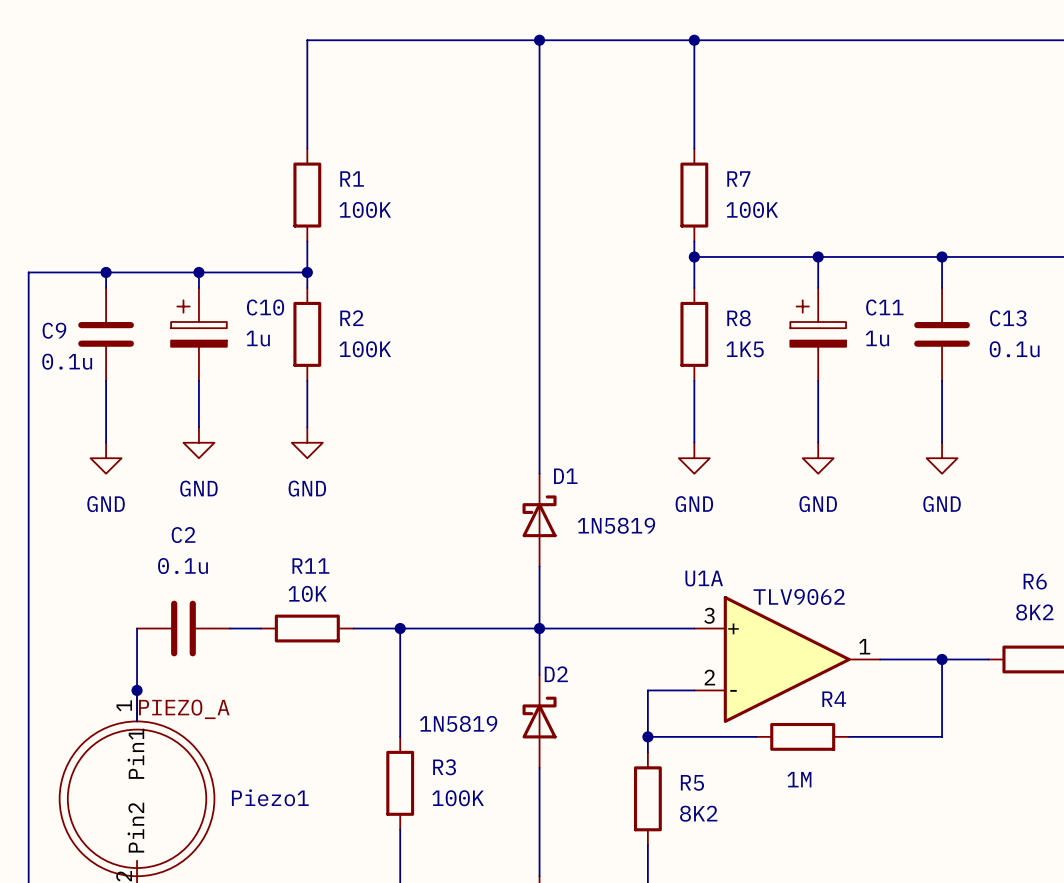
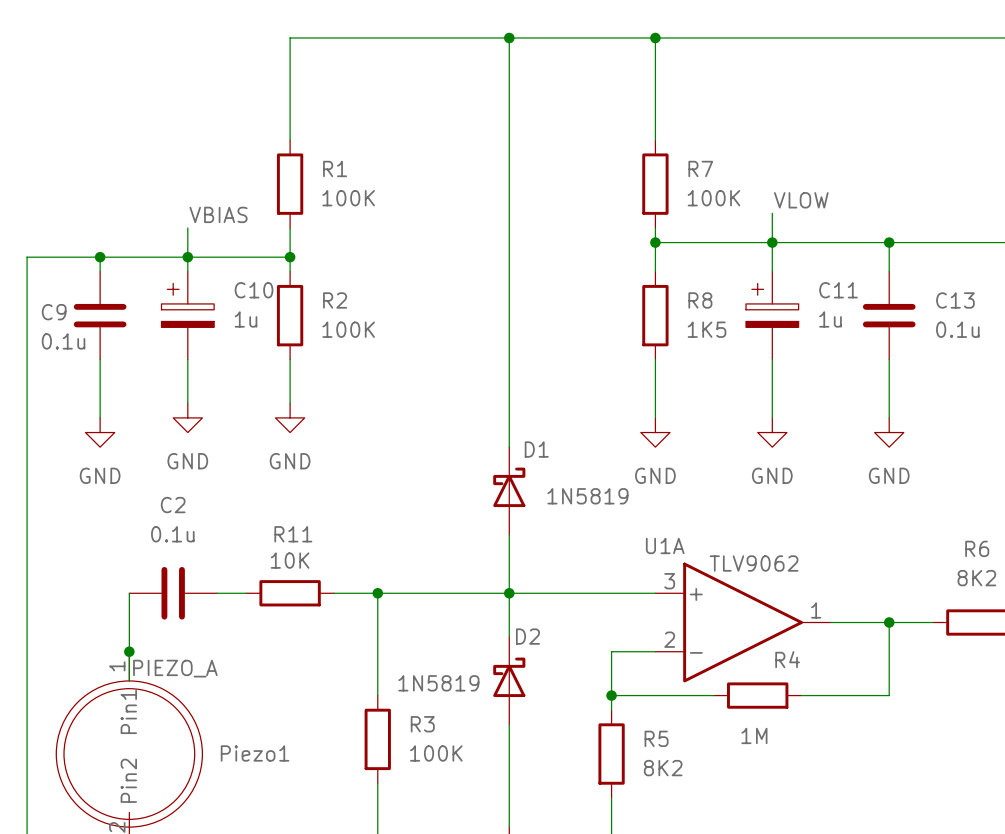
label: none -> VLOW (801, 200)
wire: none -> (772, 213) (772, 242)
label: none -> VBIAS (218, 214)
wire: none -> (187, 227) (187, 257)

